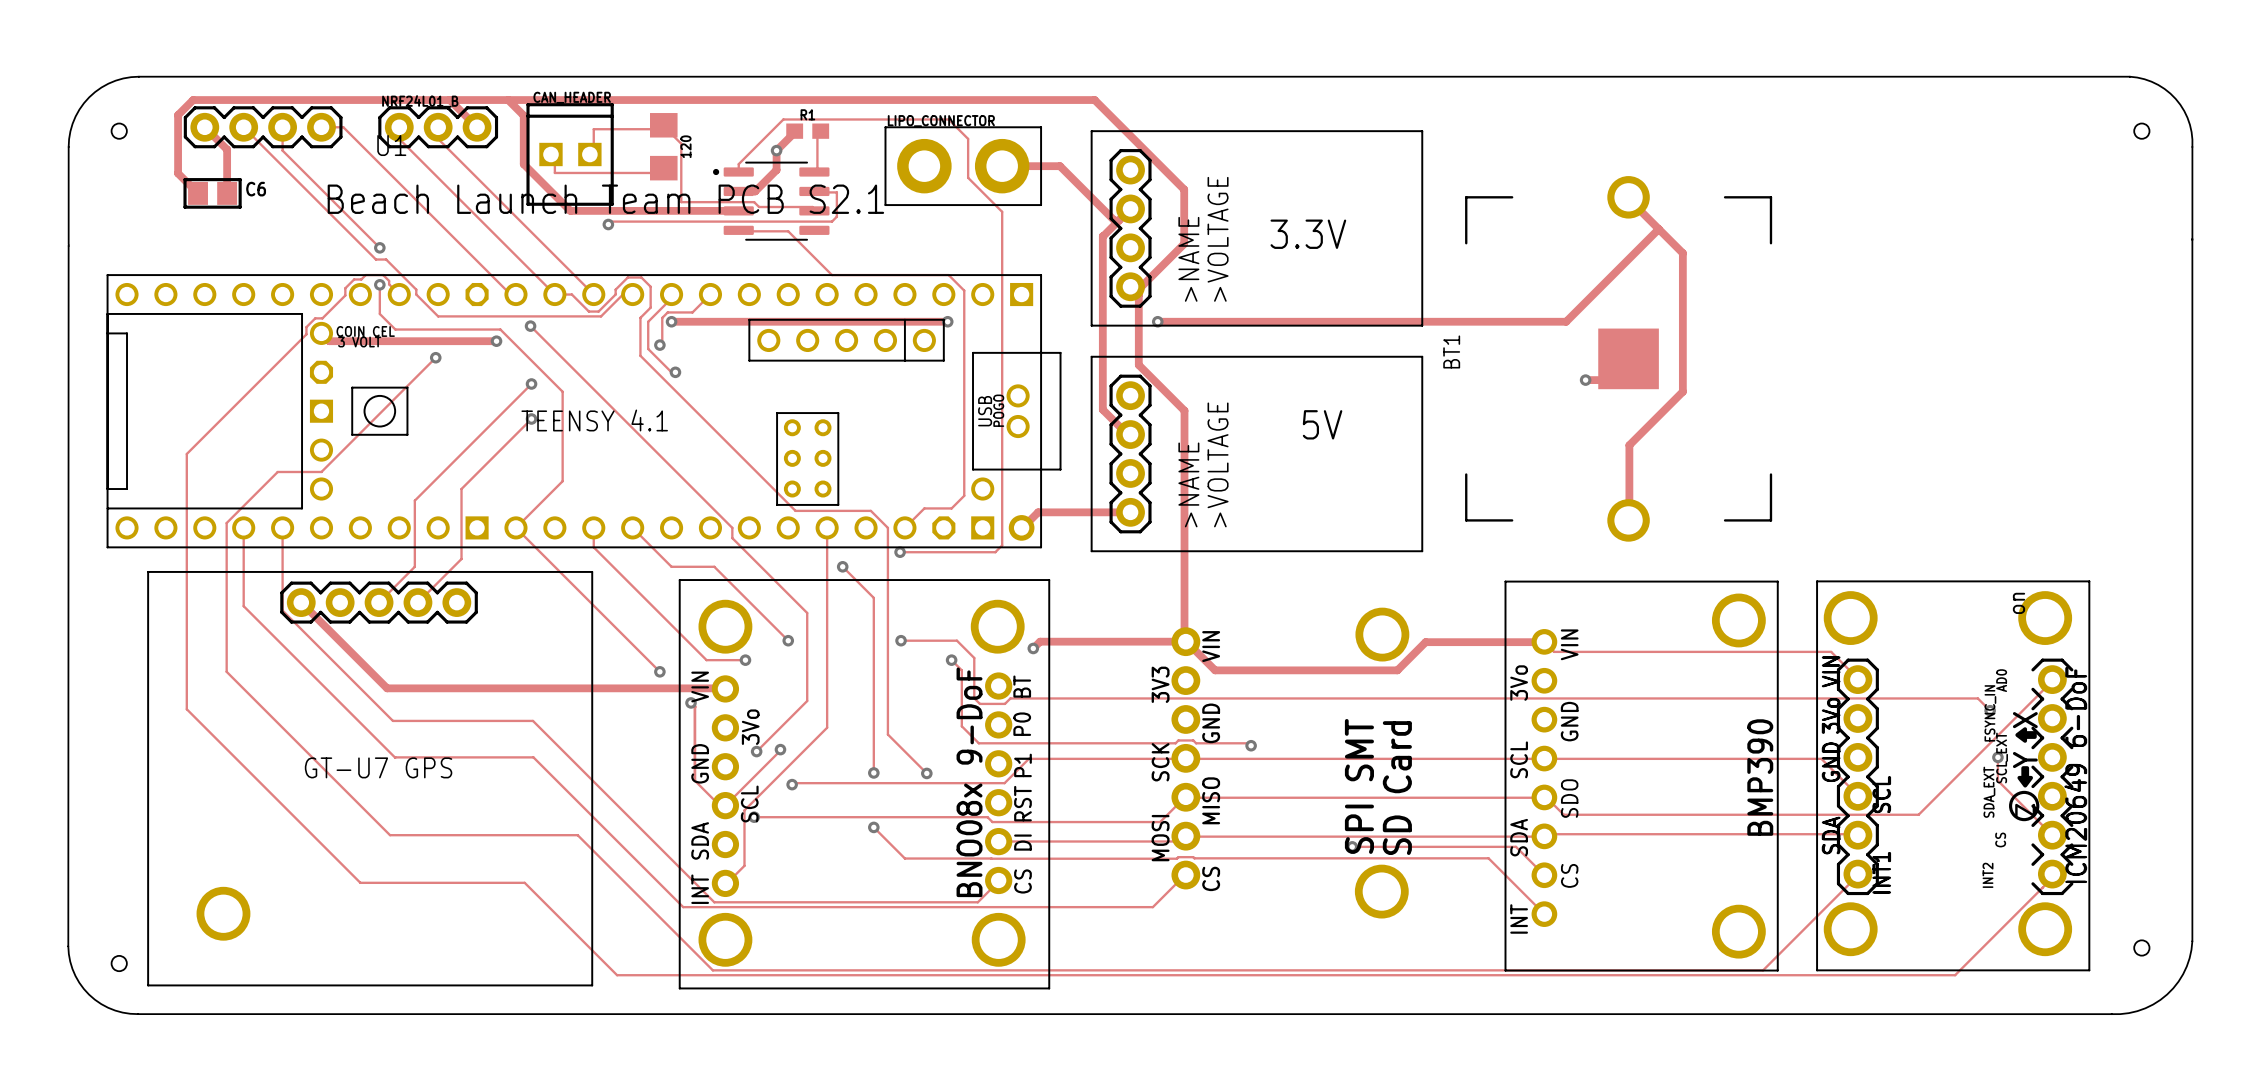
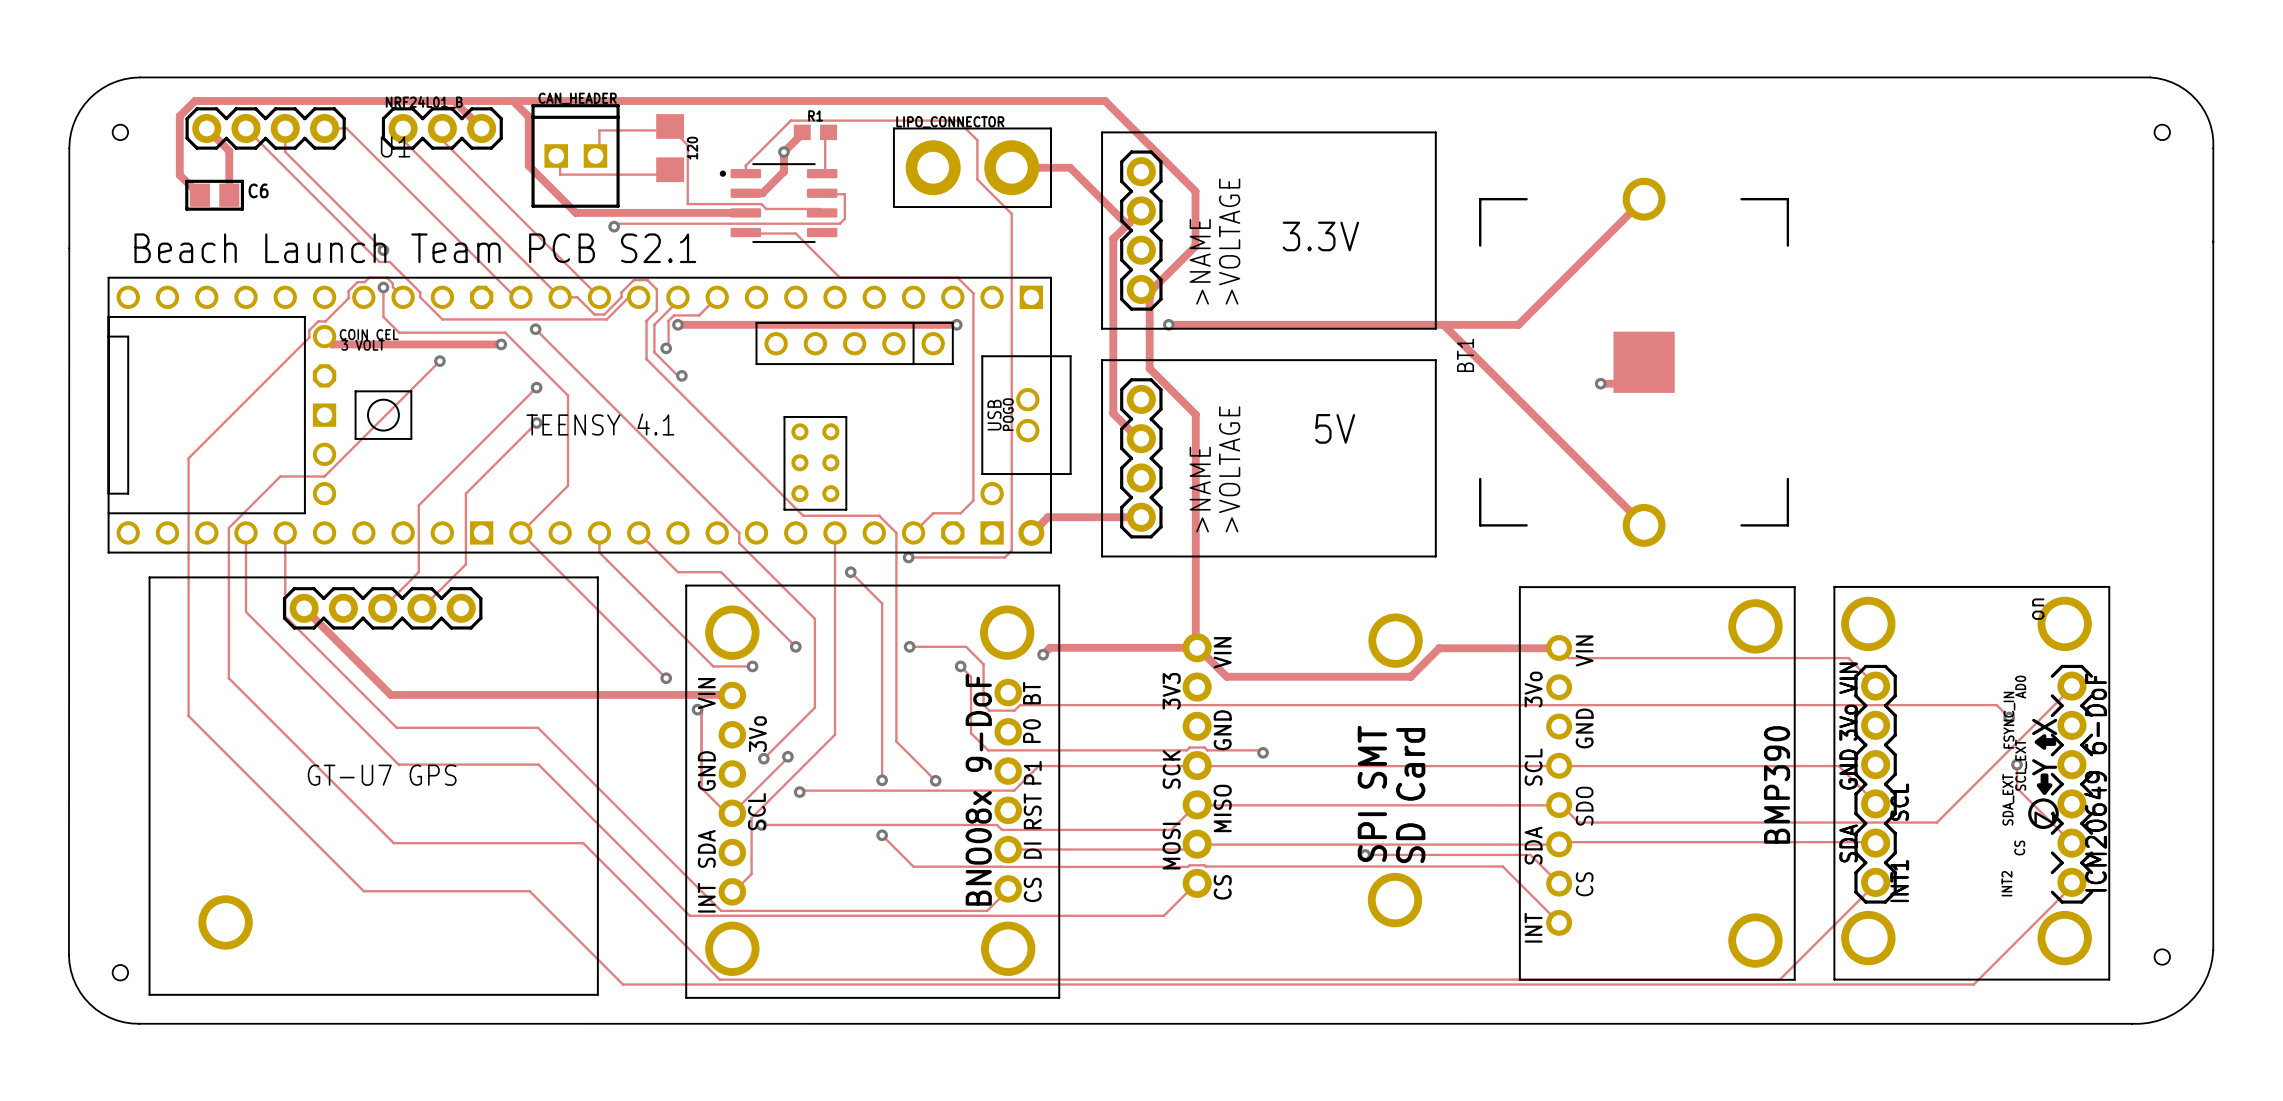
track: (1628, 197) (1682, 253) (1682, 391) (1629, 445) (1628, 520) -> (1443, 324) (1644, 525)
text position: Beach Launch Team PCB S2.1 (605, 199) -> Beach Launch Team PCB S2.1 (415, 248)
track: (1658, 229) (1566, 321) (1504, 321) -> (1644, 199) (1518, 324)

